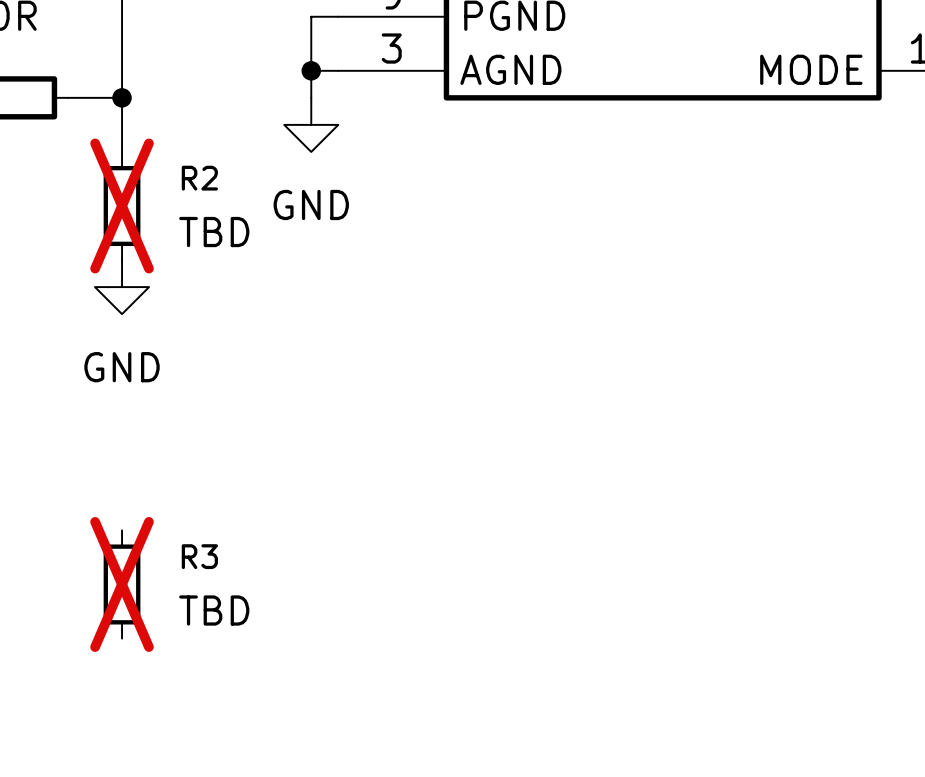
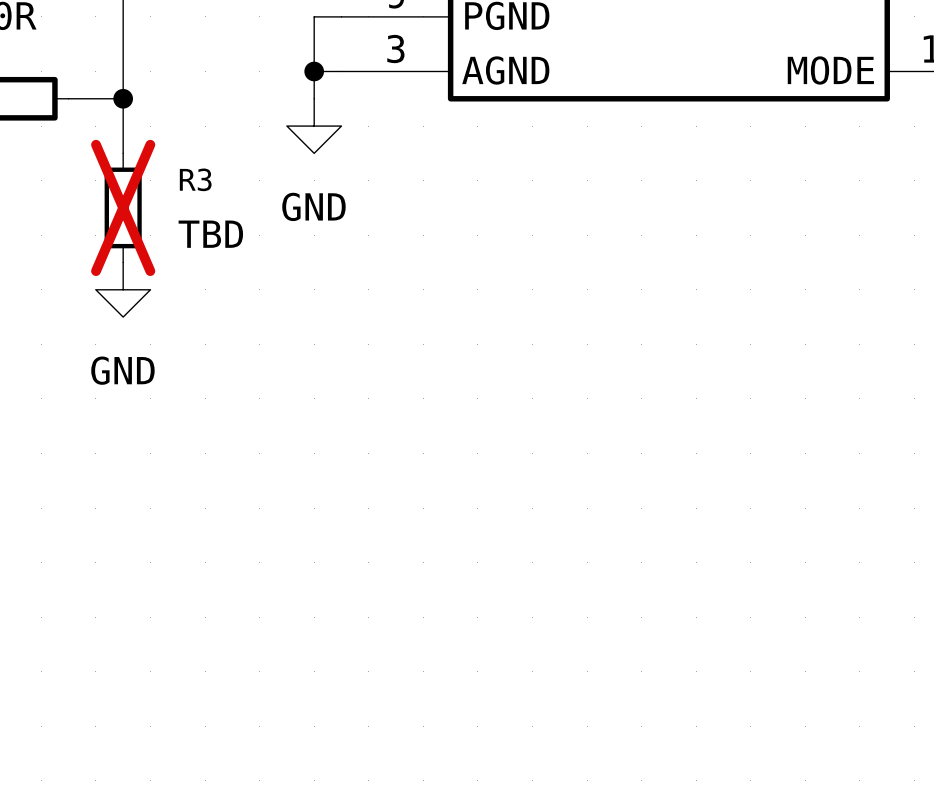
R2 name: R2 (199, 178) -> R3 (195, 179)
R3: TBD (122, 584) -> none

